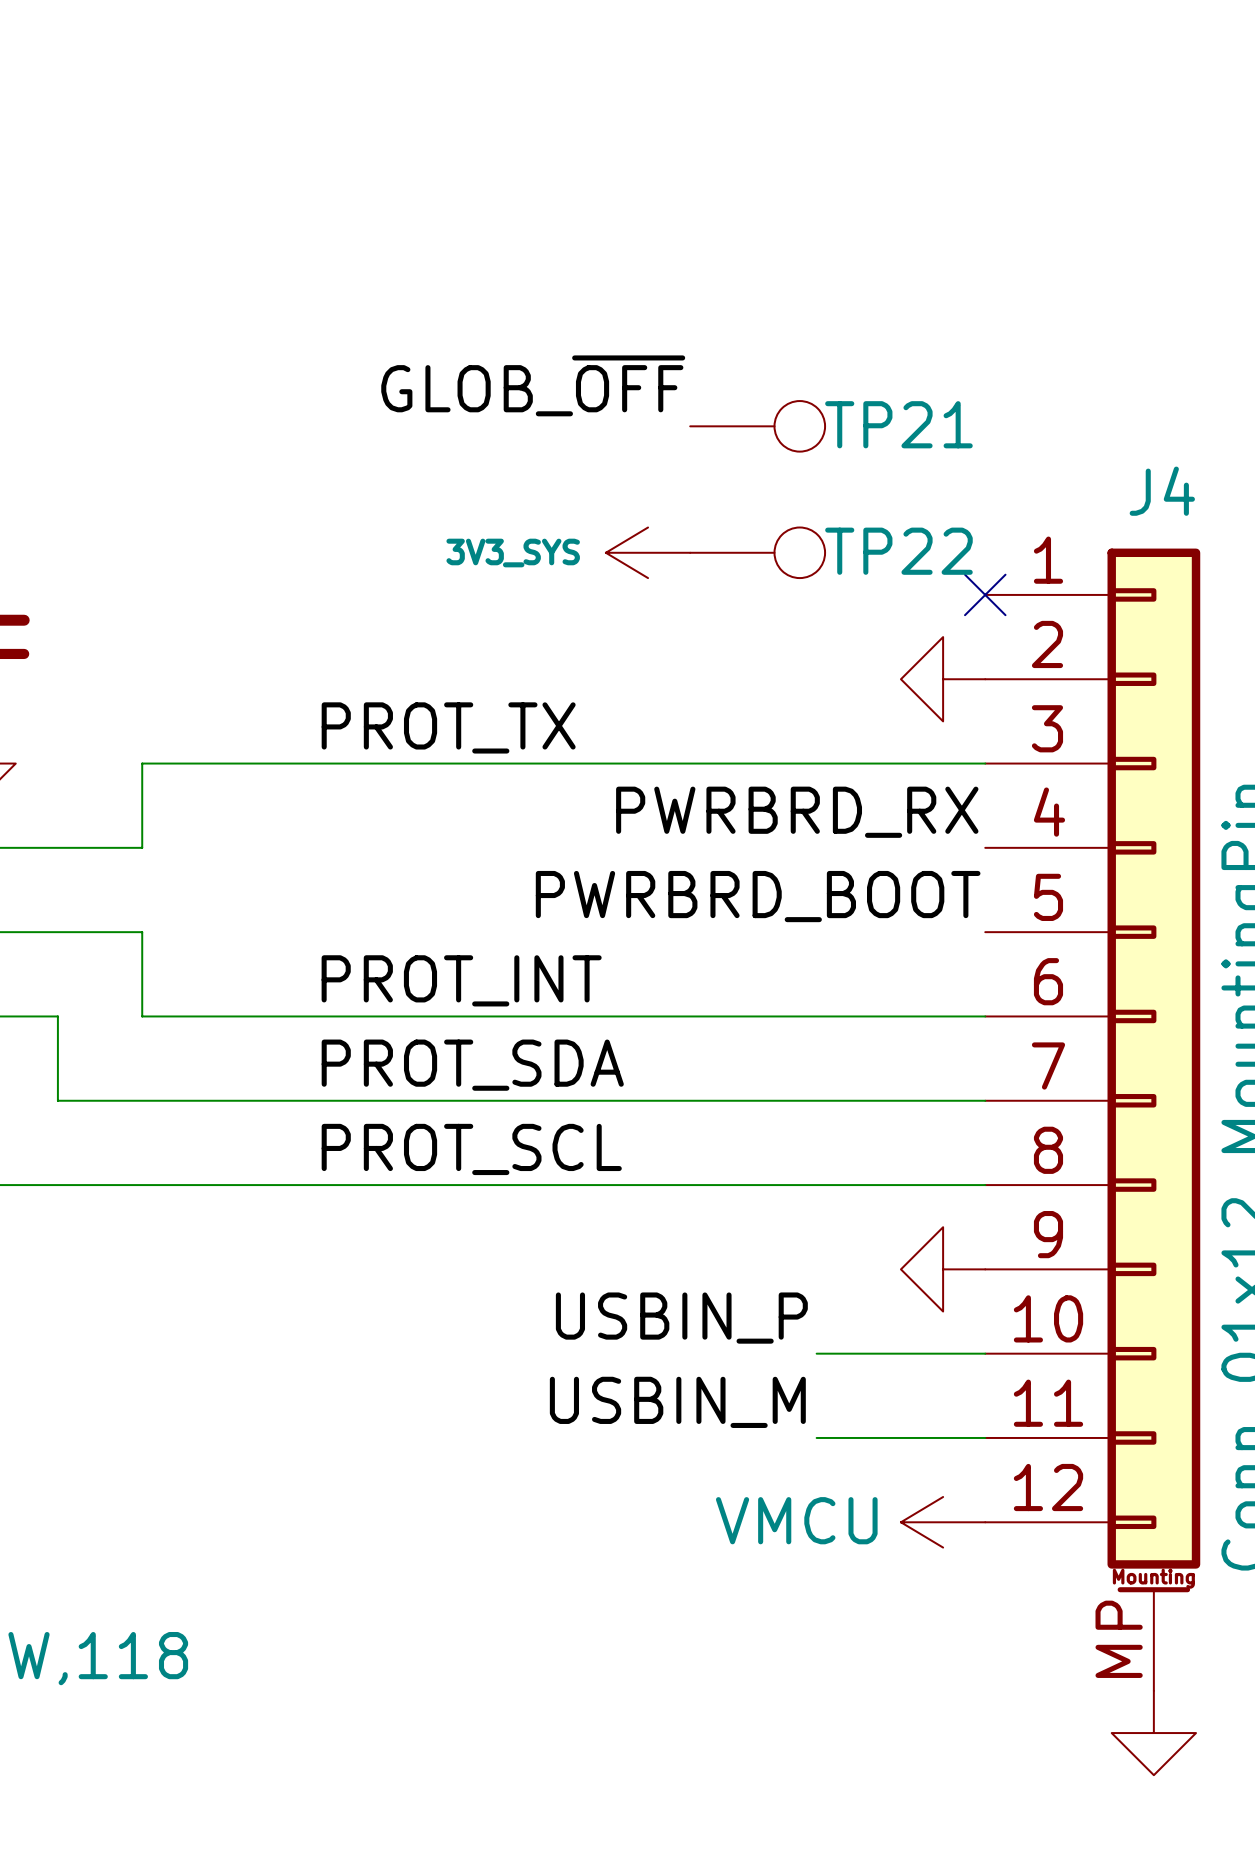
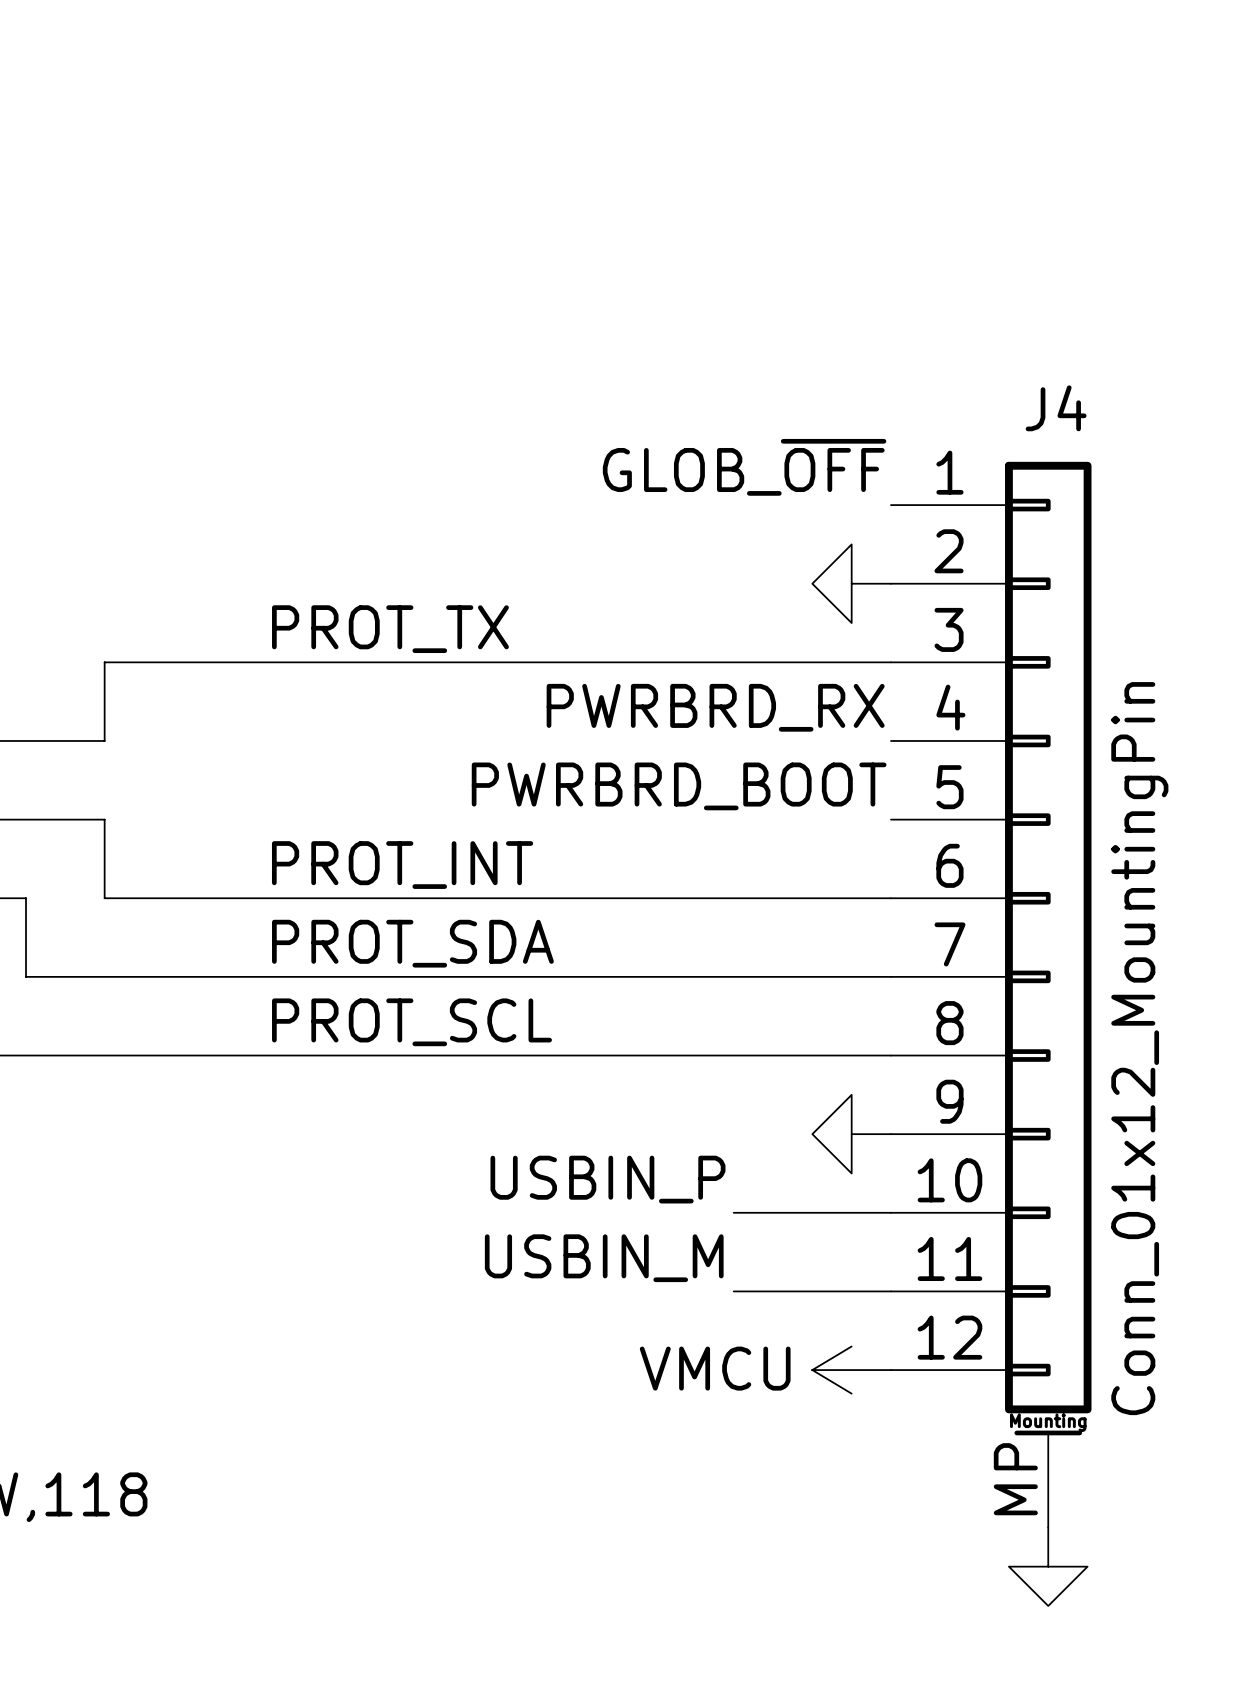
label position: GLOB_~{OFF} (533, 385) -> GLOB_~{OFF} (744, 467)
TP21: (757, 426) -> none
power symbol: 3V3_SYS (648, 552) -> none
TP22: (757, 552) -> none
no-connect mark: (985, 594) -> none

